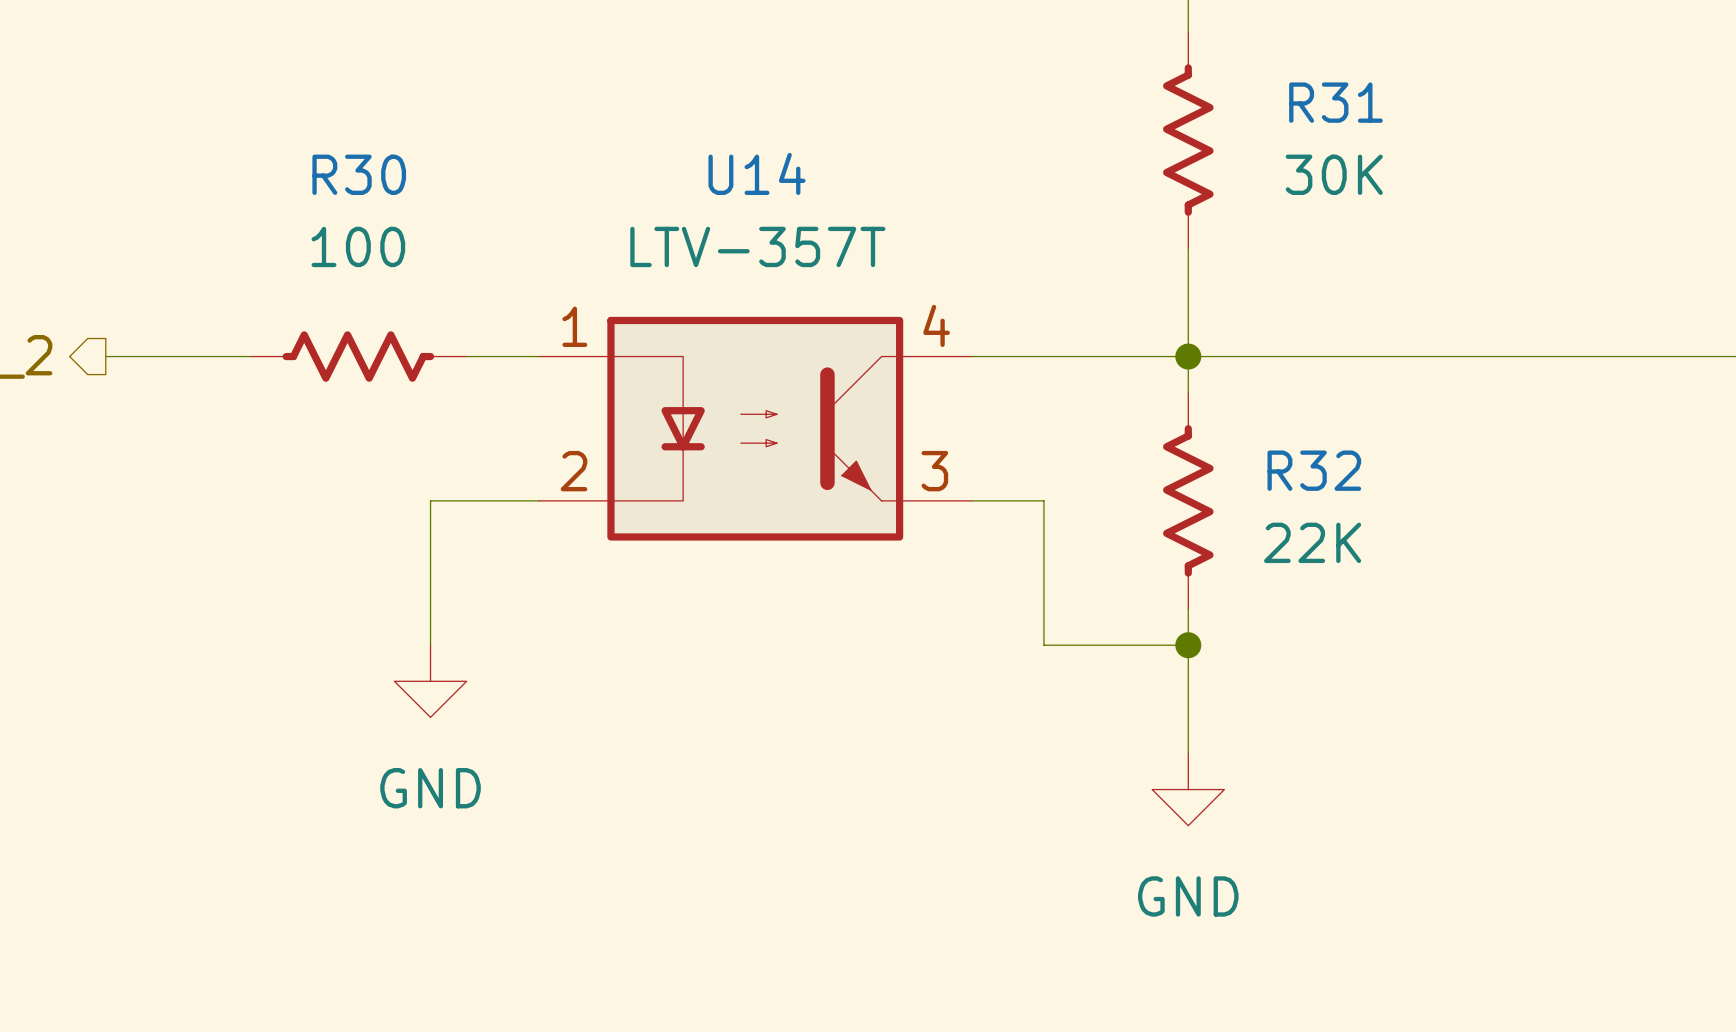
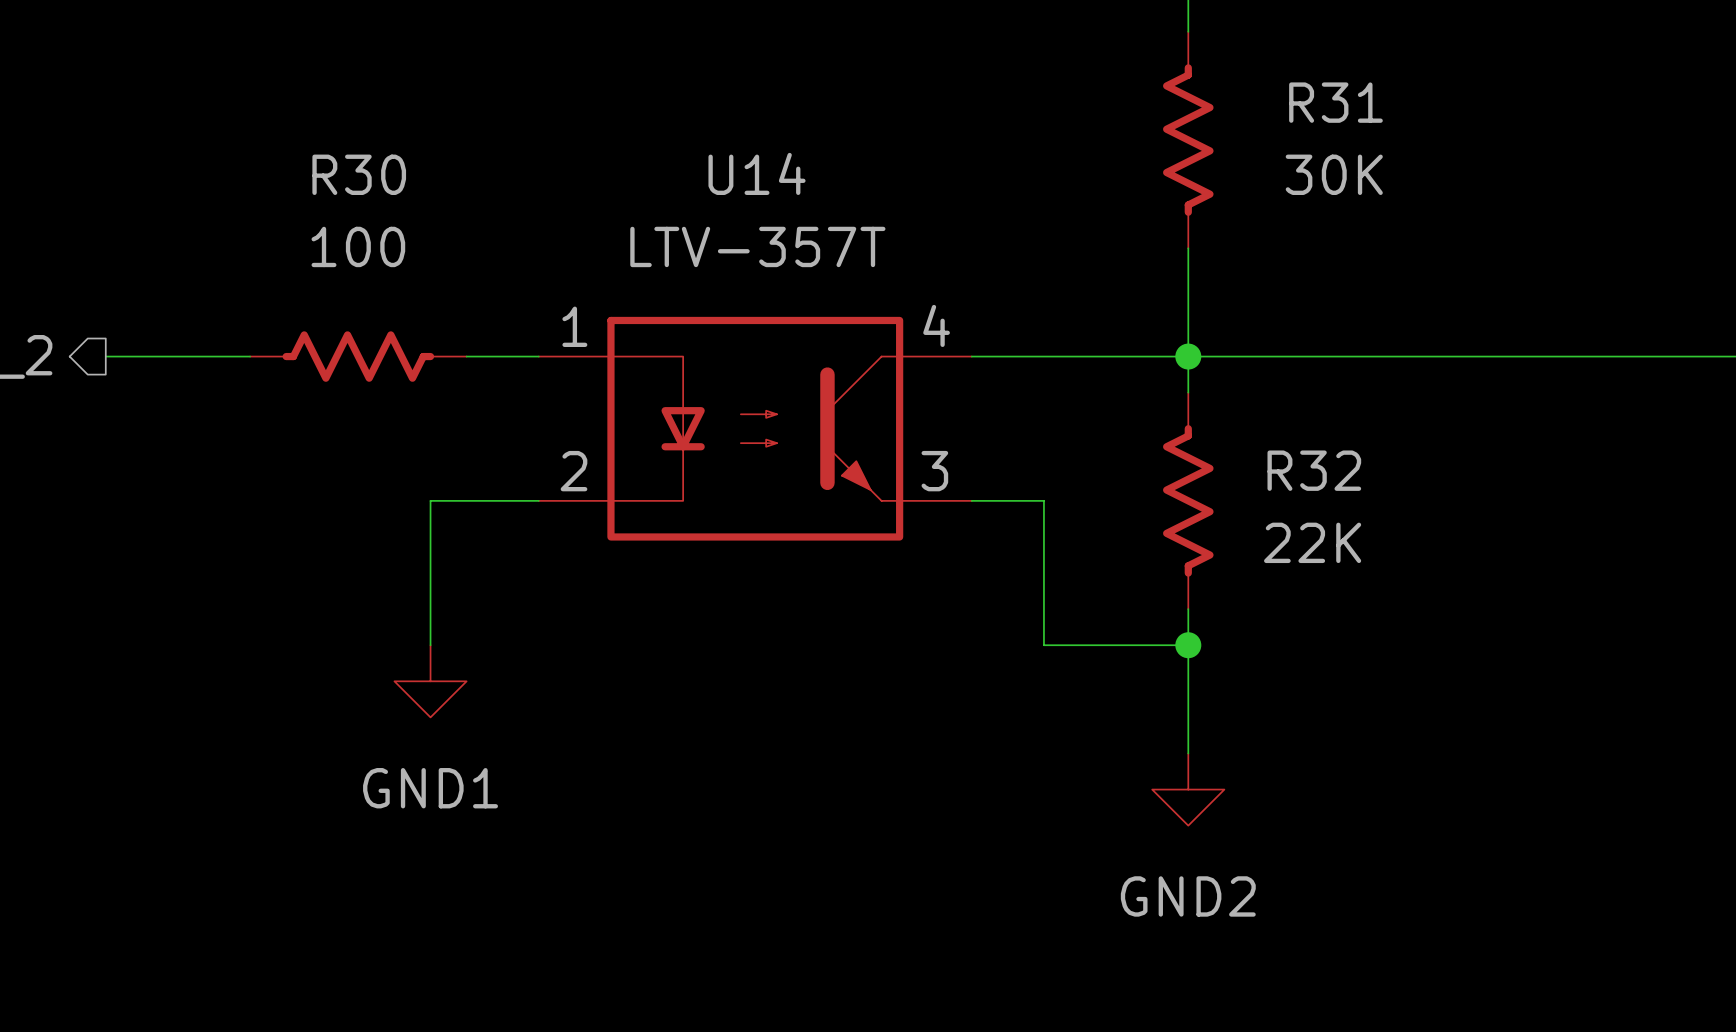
power symbol: GND (430, 681) -> GND1 (430, 681)
power symbol: GND (1188, 789) -> GND2 (1188, 789)

